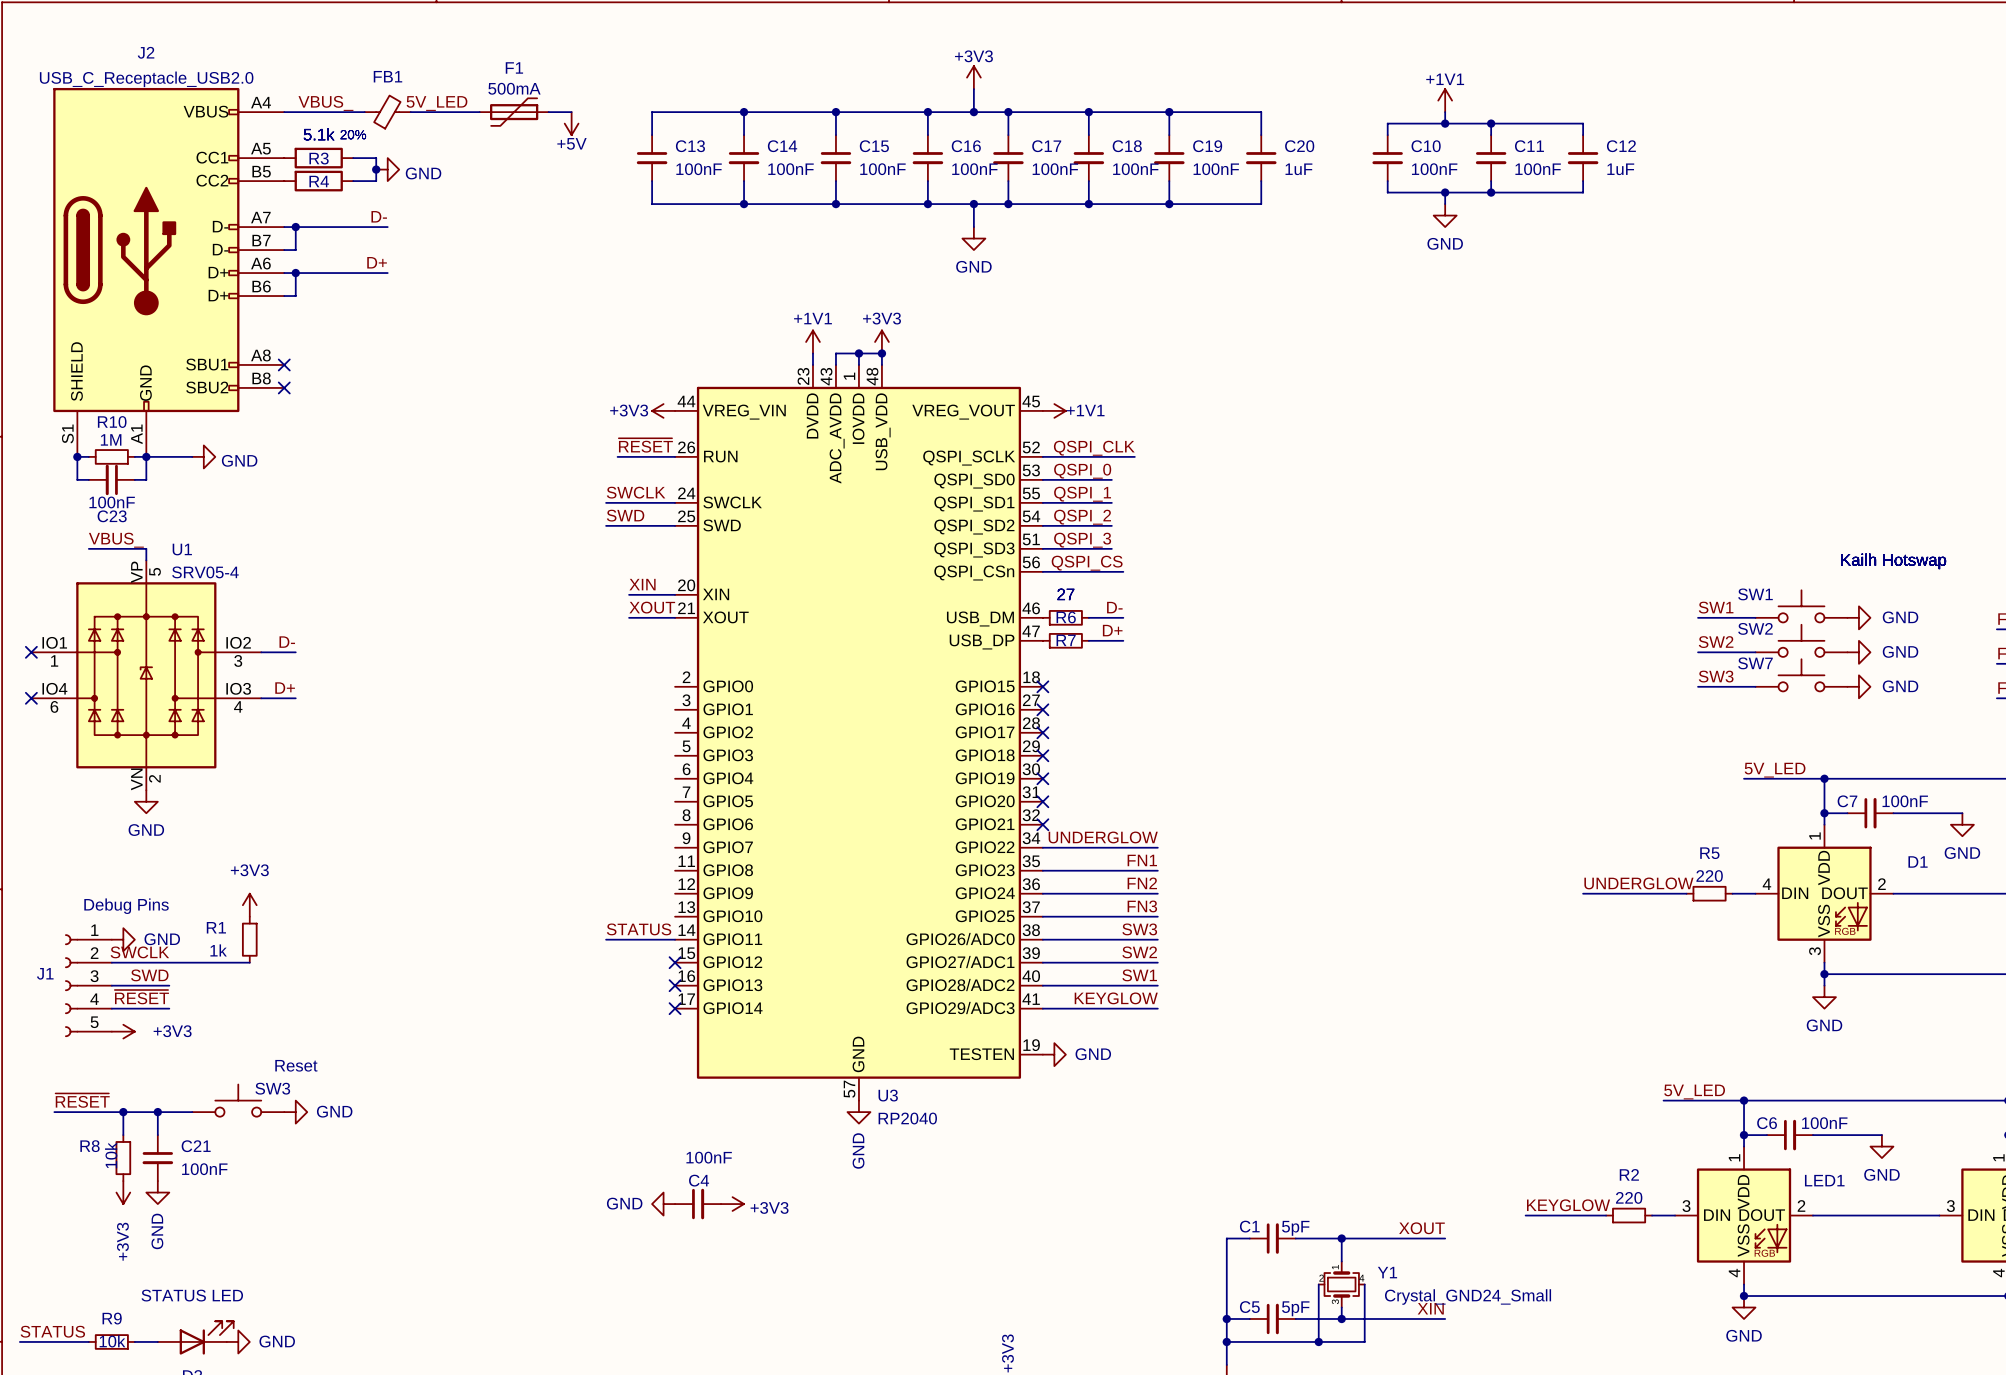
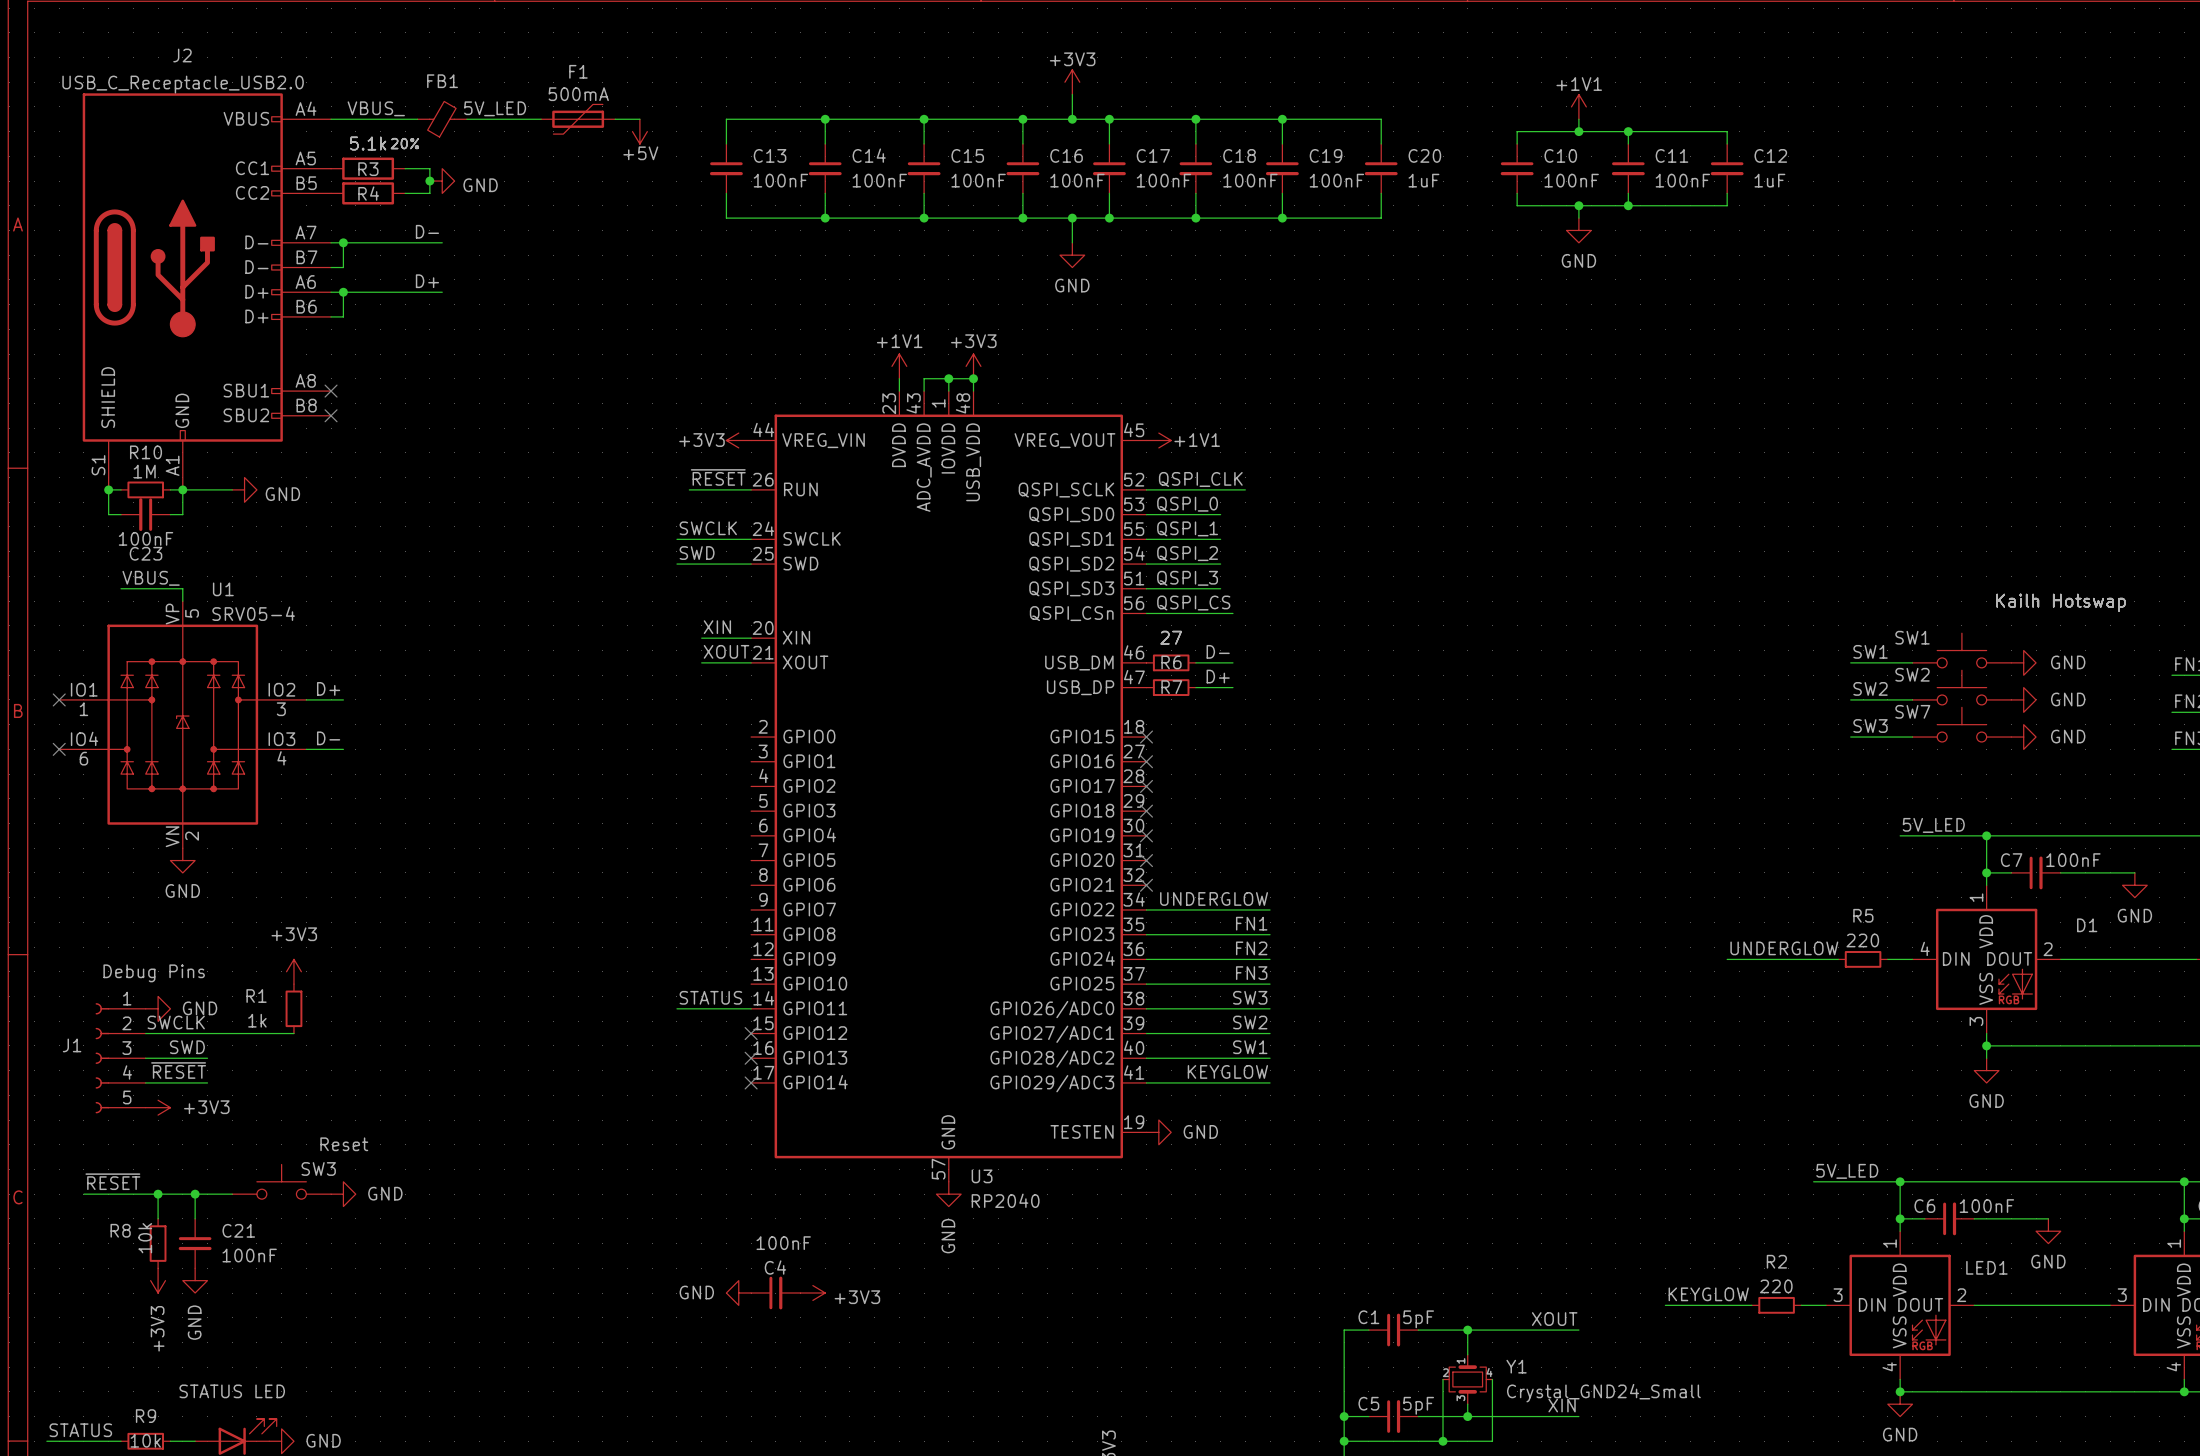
label: D- (287, 642) -> D+ (328, 688)
label: D+ (285, 688) -> D- (328, 738)

